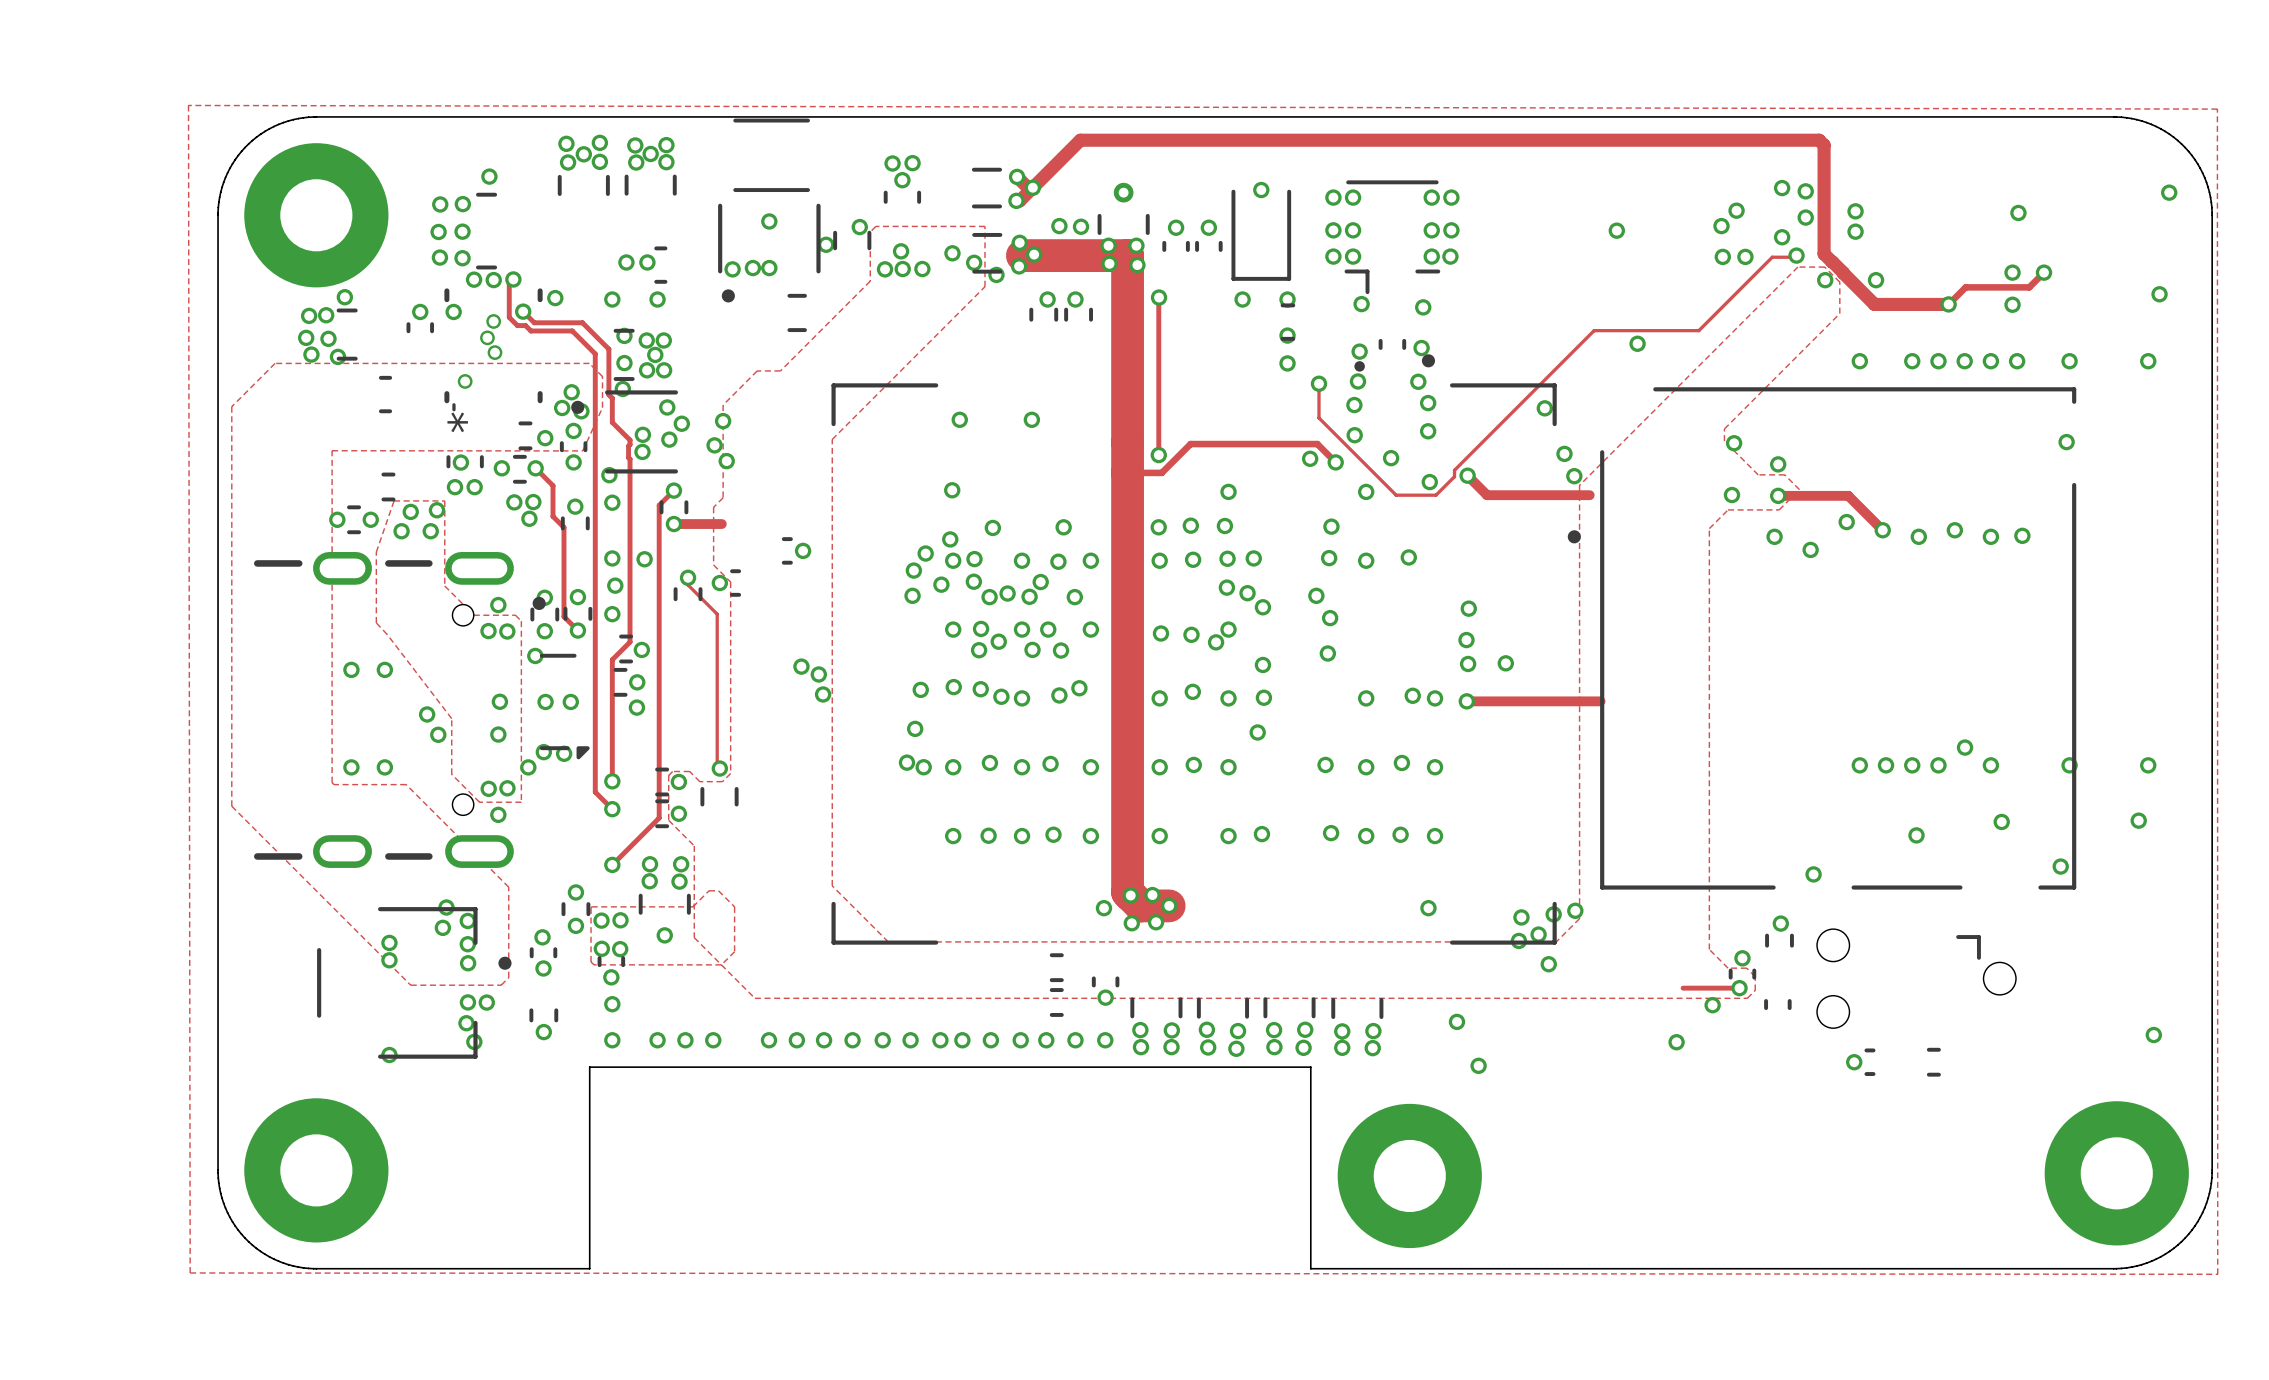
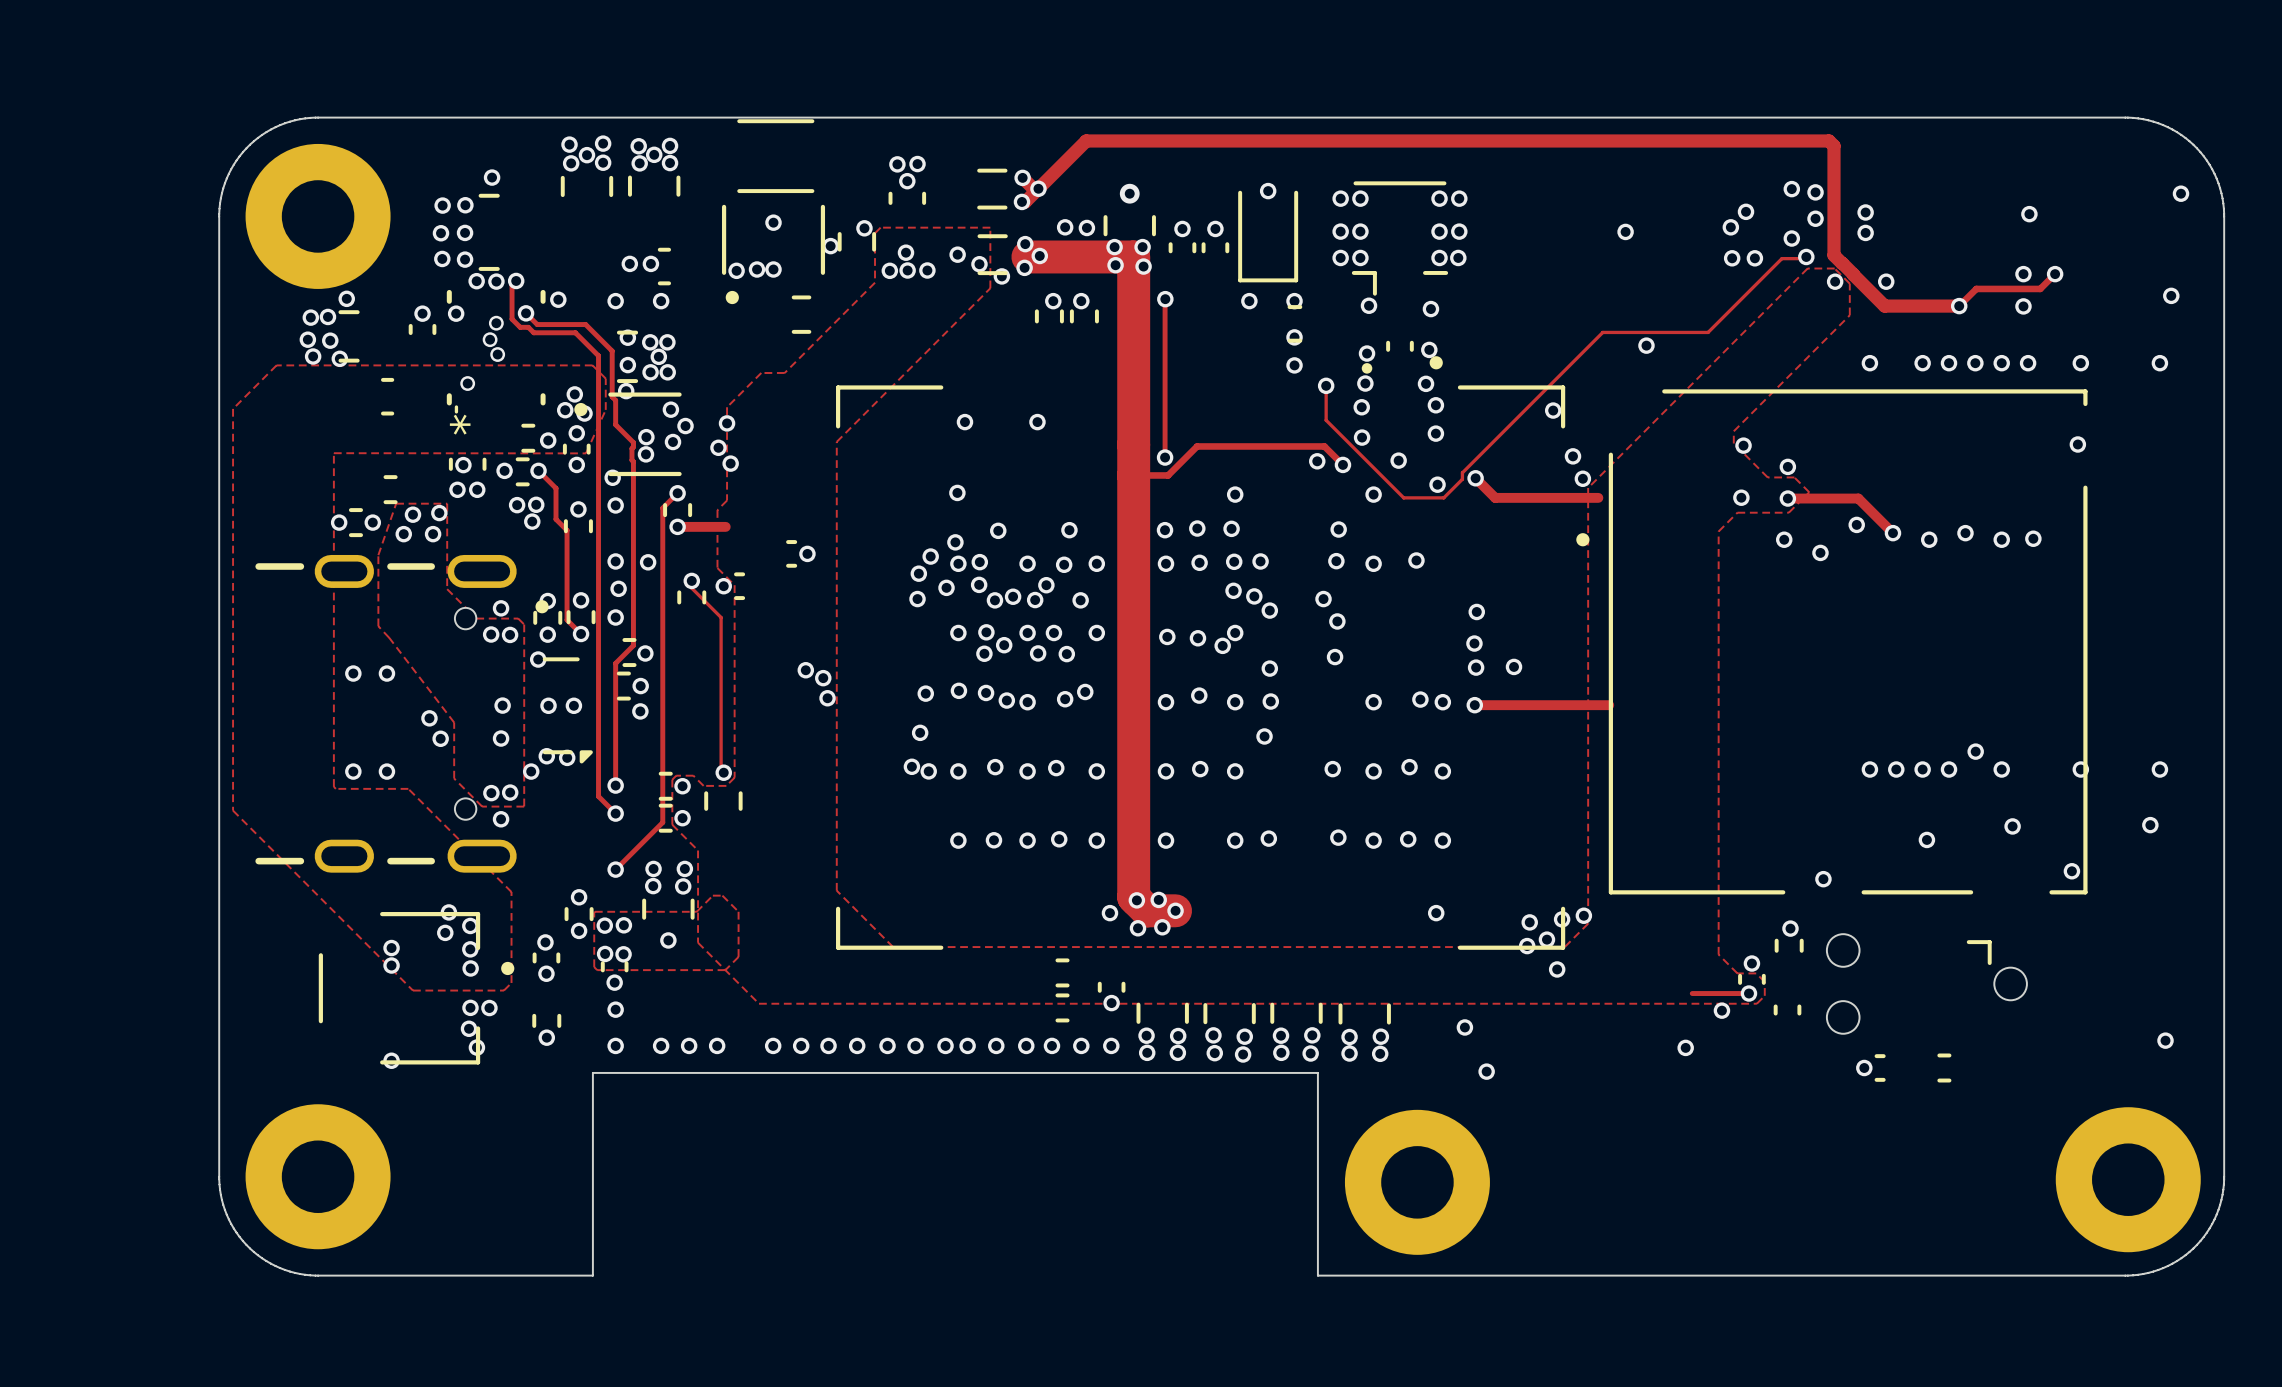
zone outline: (188, 105) (190, 1272) (2217, 1274) (2217, 109) (188, 105) -> none

